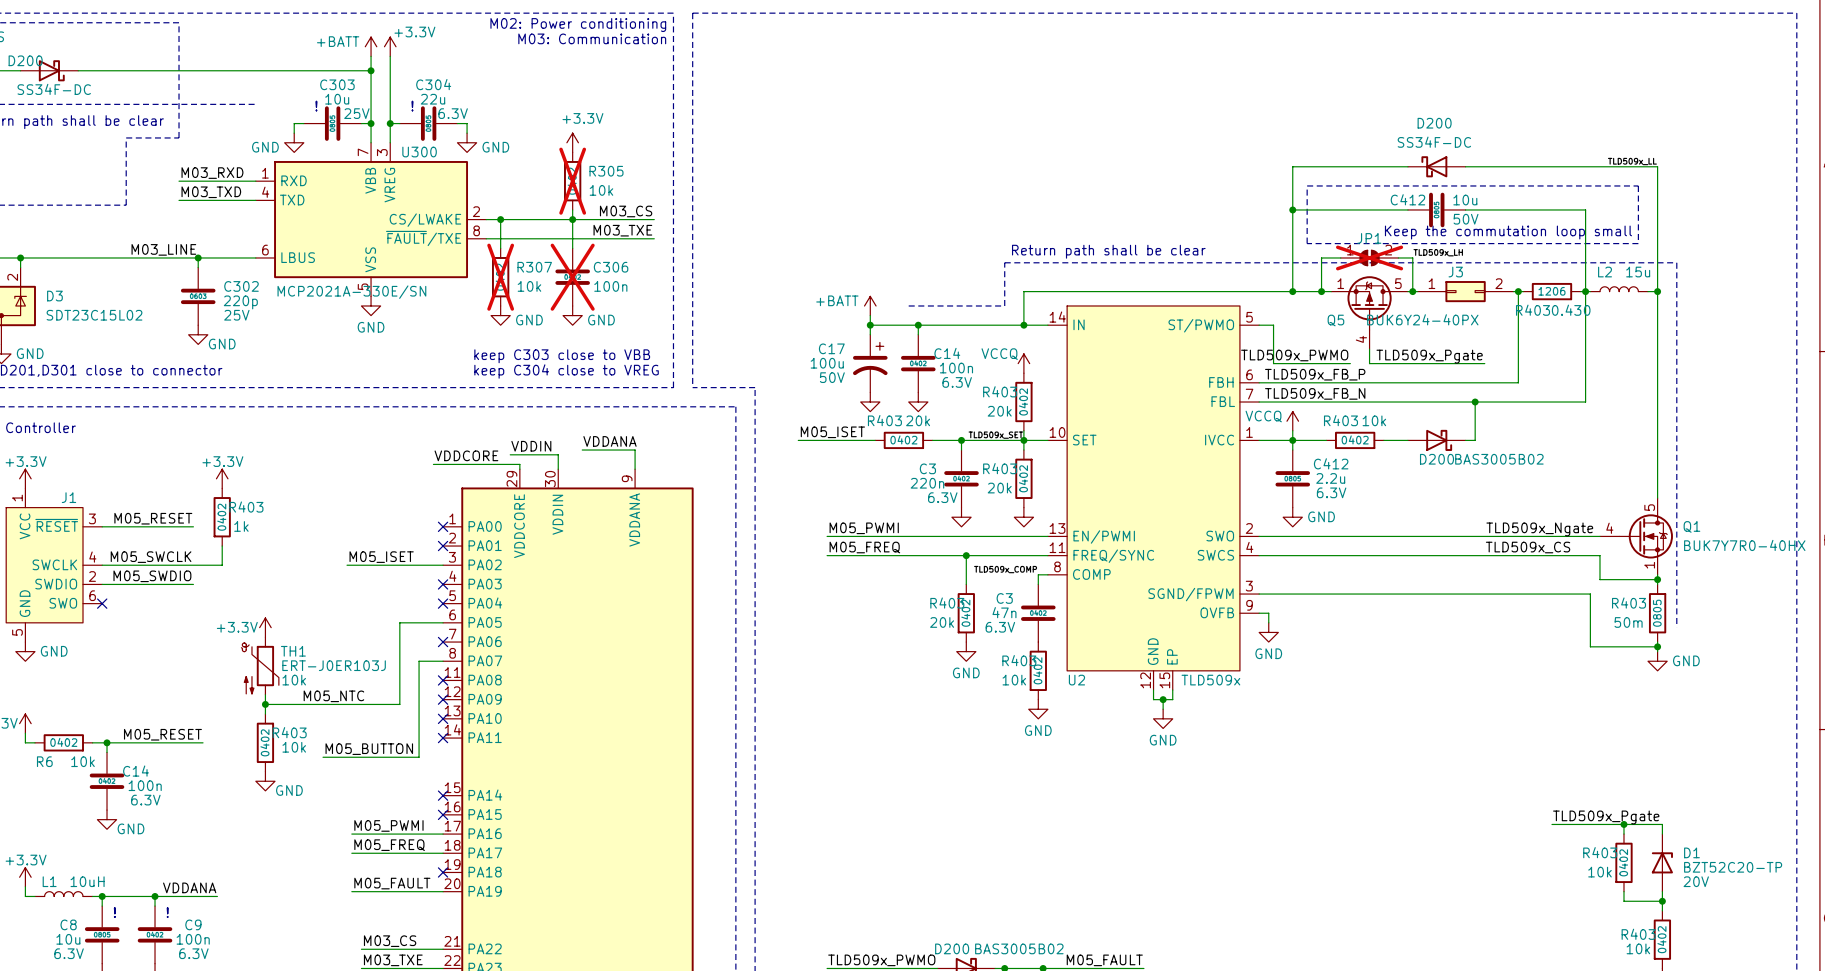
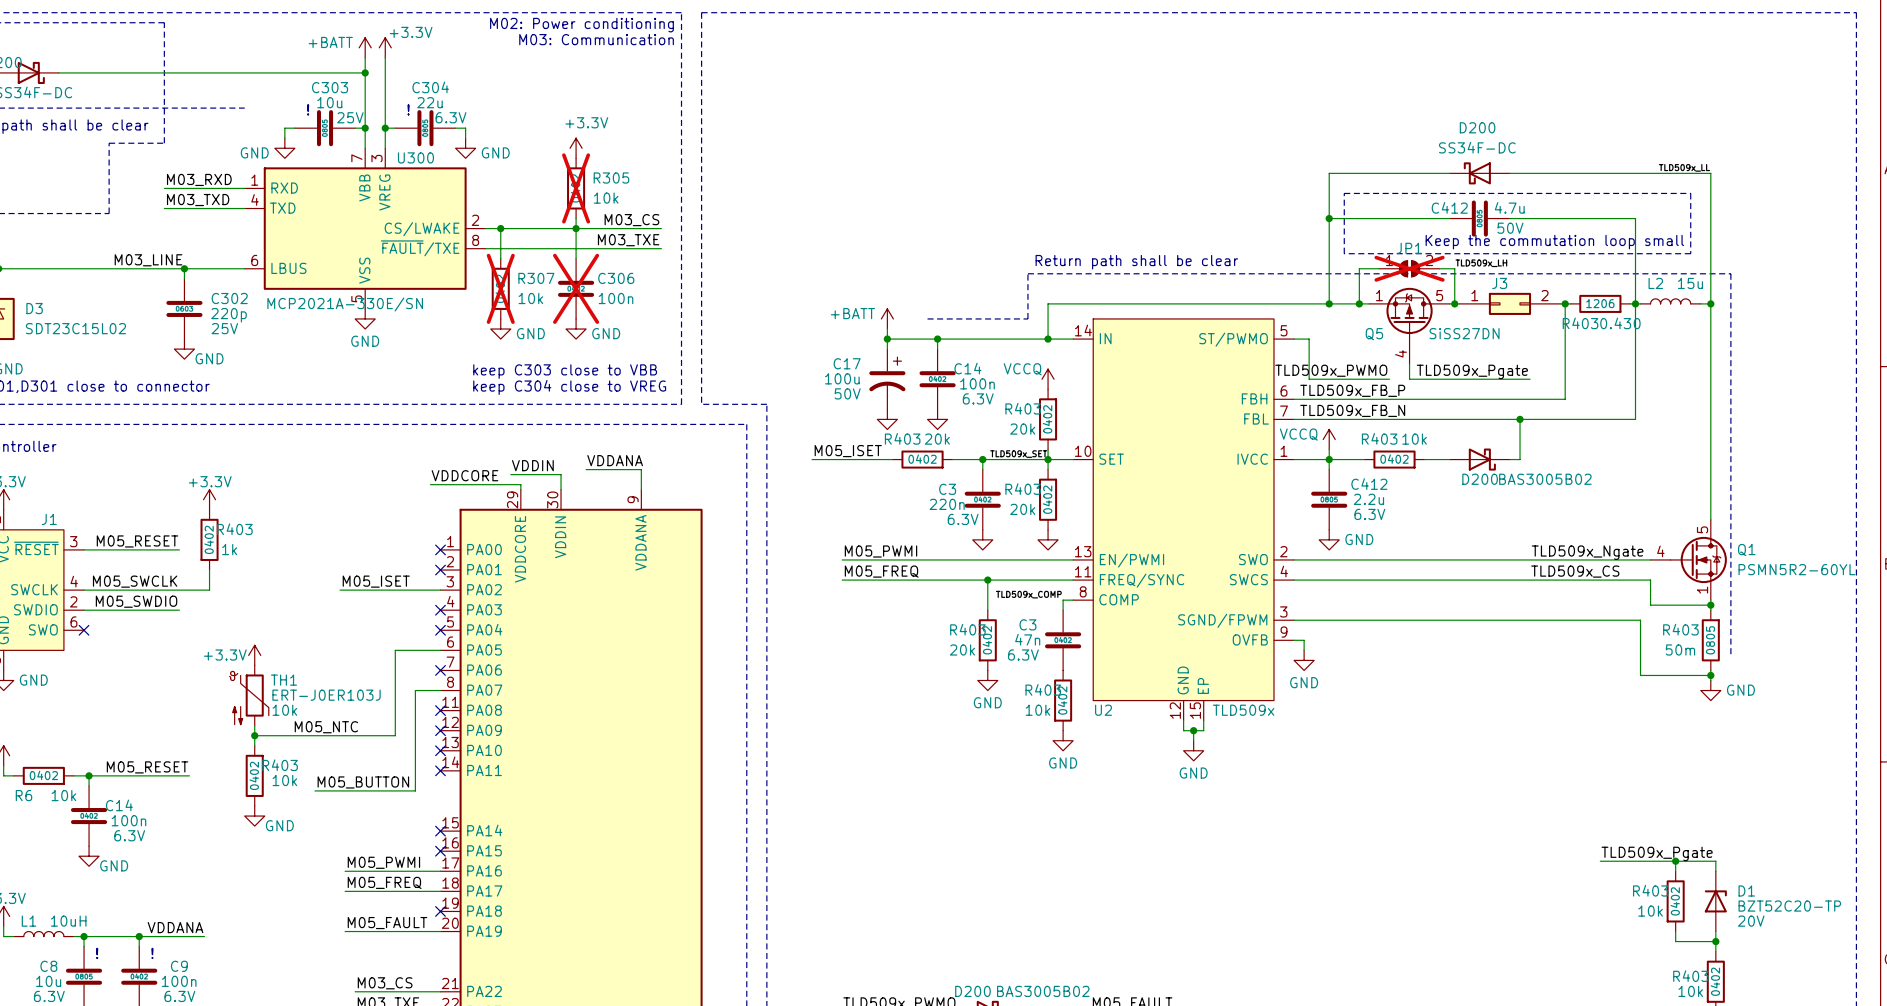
C412 value: 10u (1465, 200) -> 4.7u (1509, 207)
Q5 value: BUK6Y24-40PX (1422, 319) -> SiSS27DN (1464, 333)
Q1 value: BUK7Y7R0-40HX (1744, 545) -> PSMN5R2-60YL (1796, 569)

